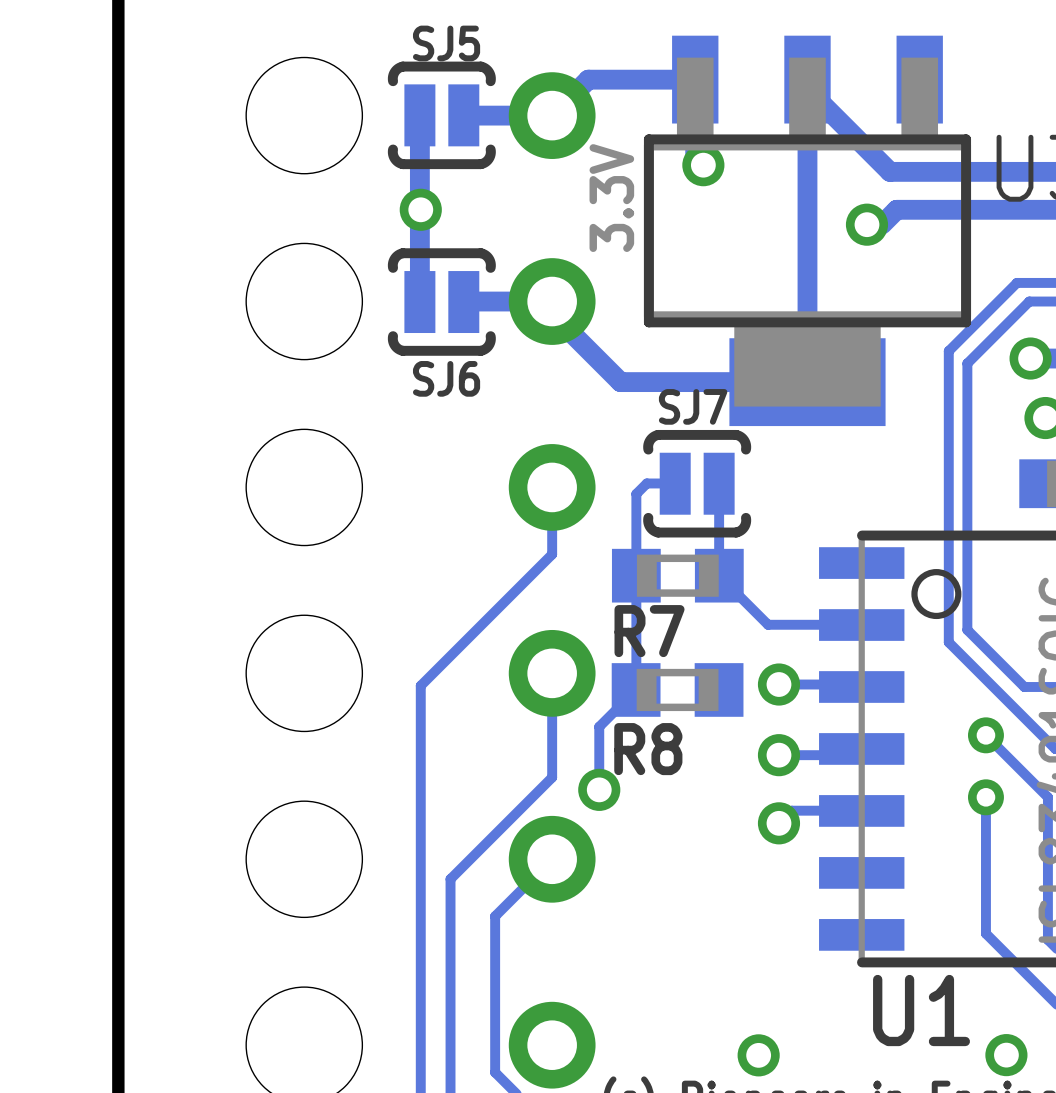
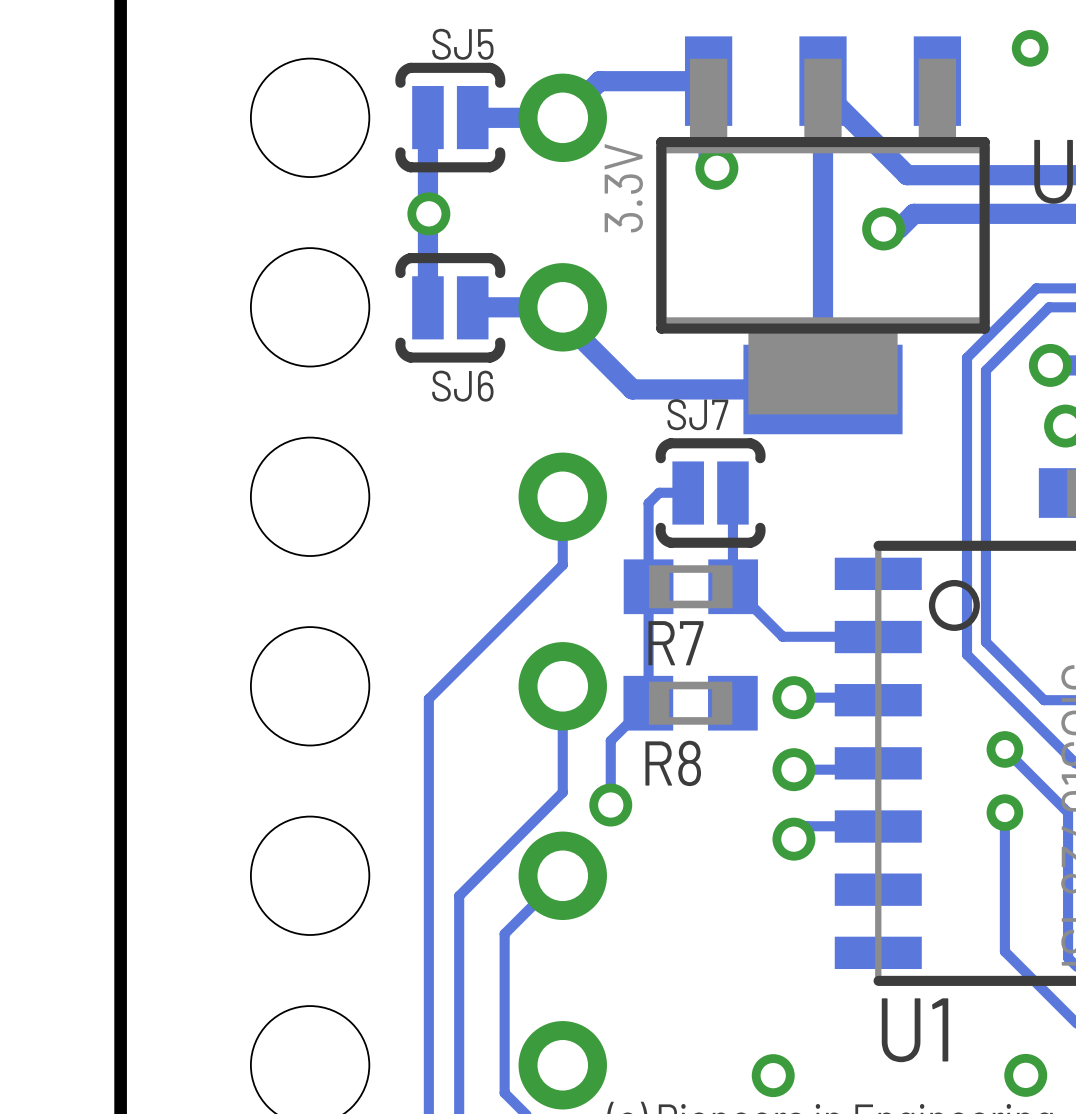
via: none -> (1030, 48)

